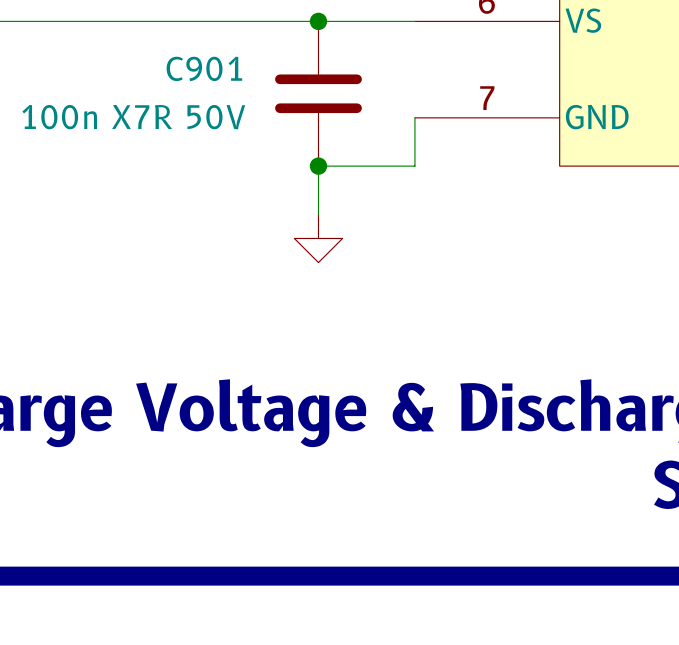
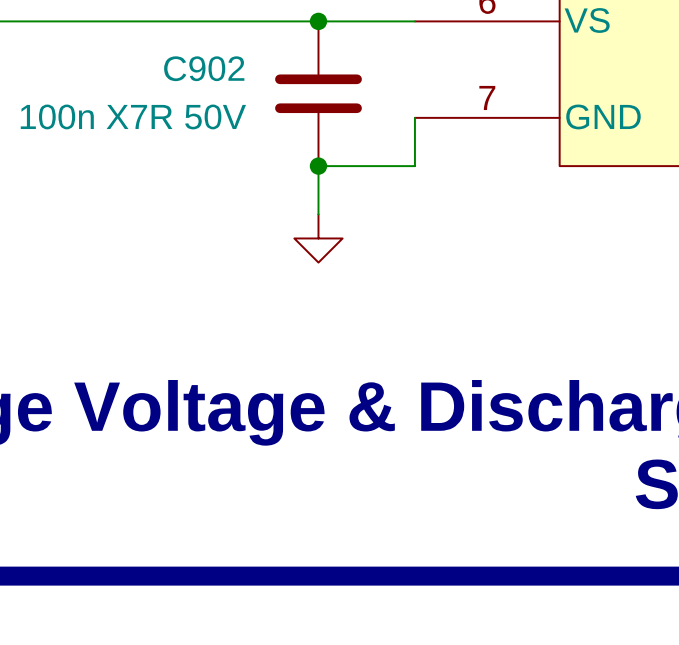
C901 name: C901 (204, 68) -> C902 (204, 68)

